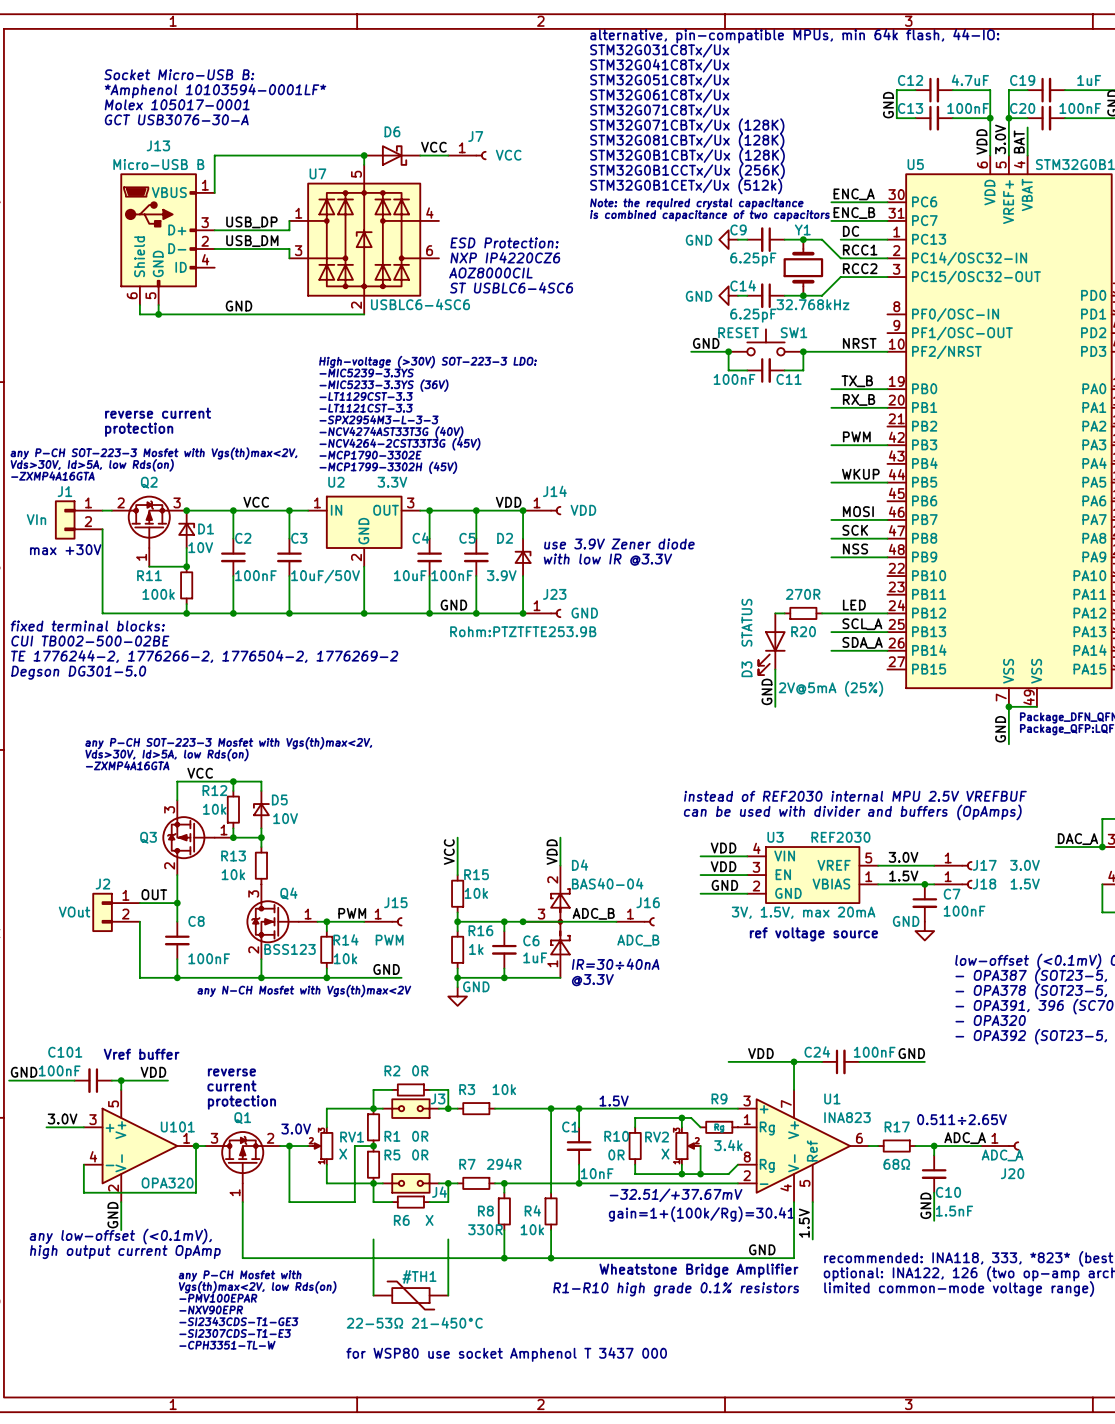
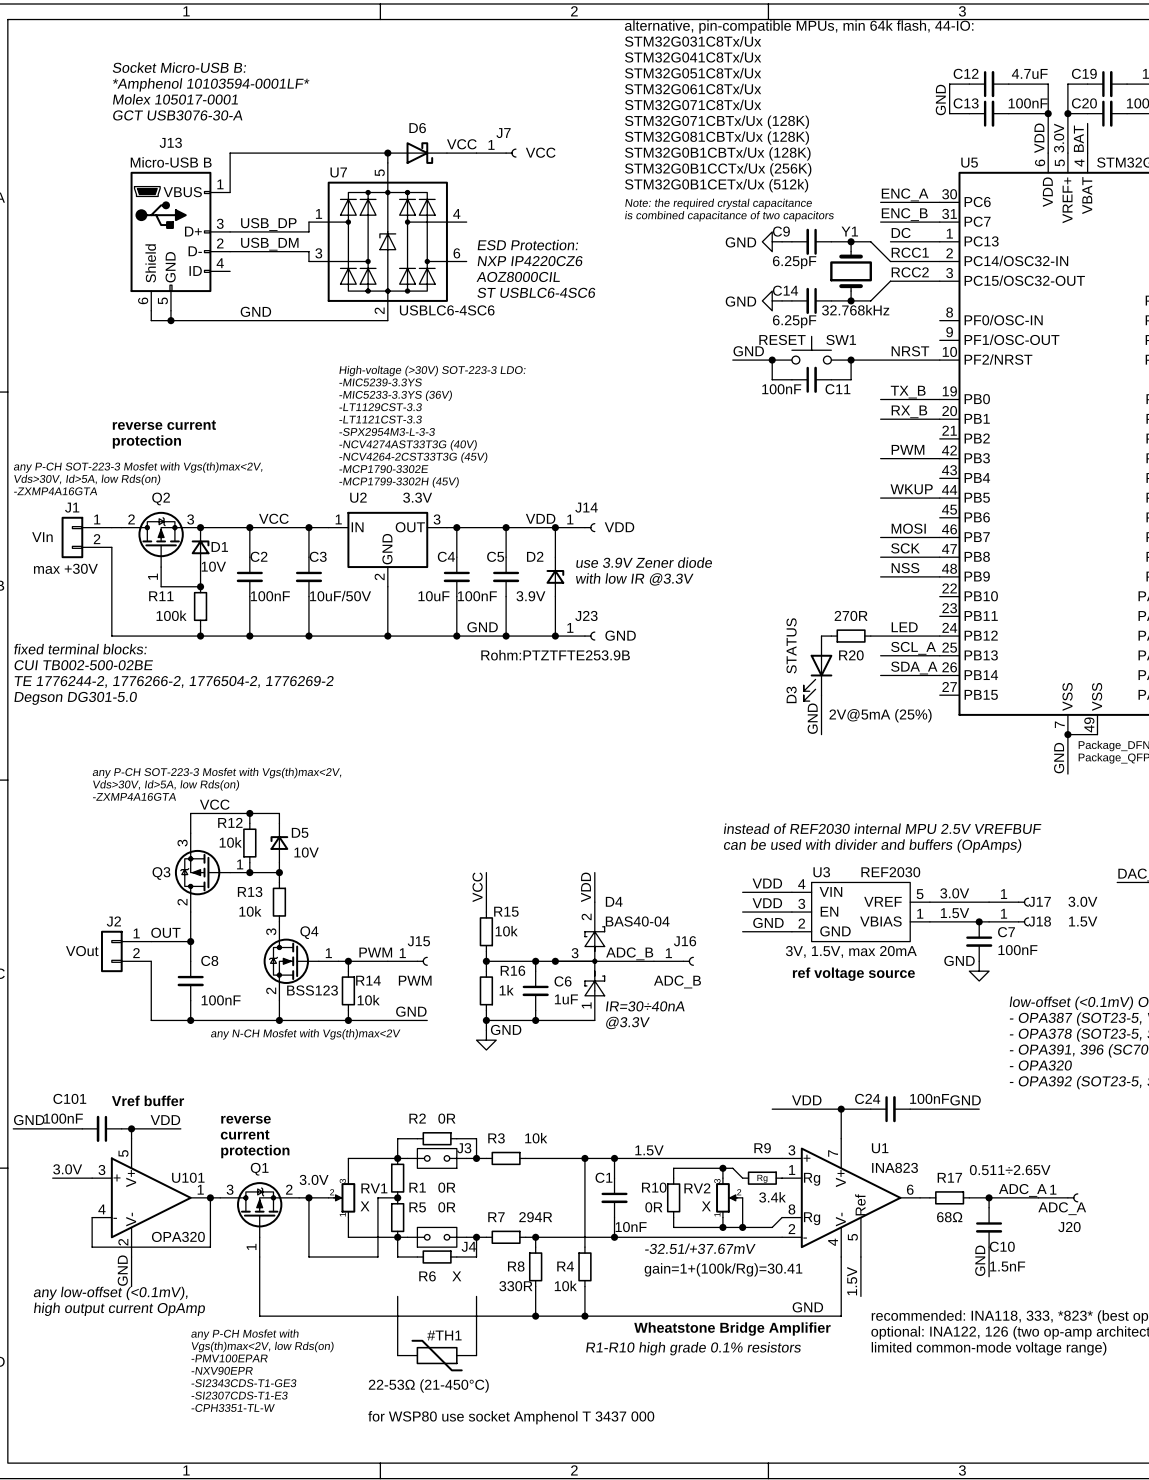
power symbol: 22-53Ω 21-450°C (410, 1295) -> 22-53Ω (21-450°C) (437, 1355)

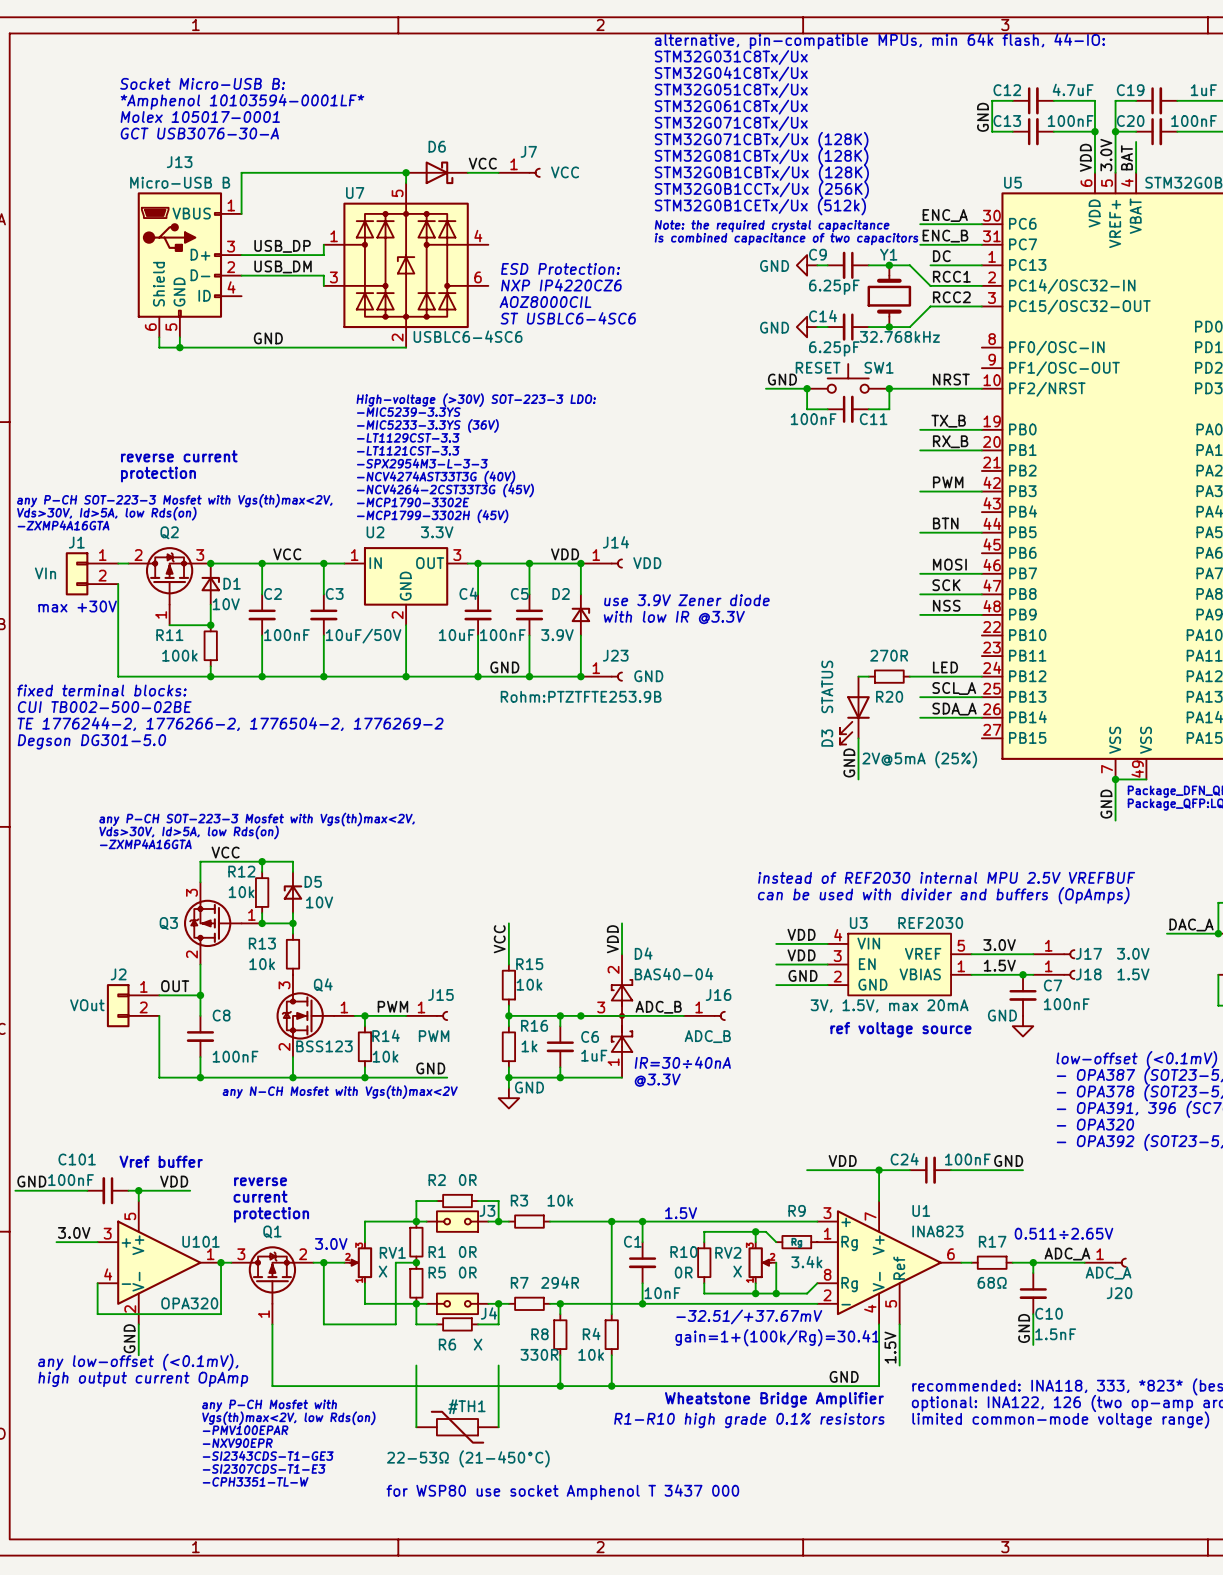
label: WKUP (911, 489) -> BTN (945, 523)

